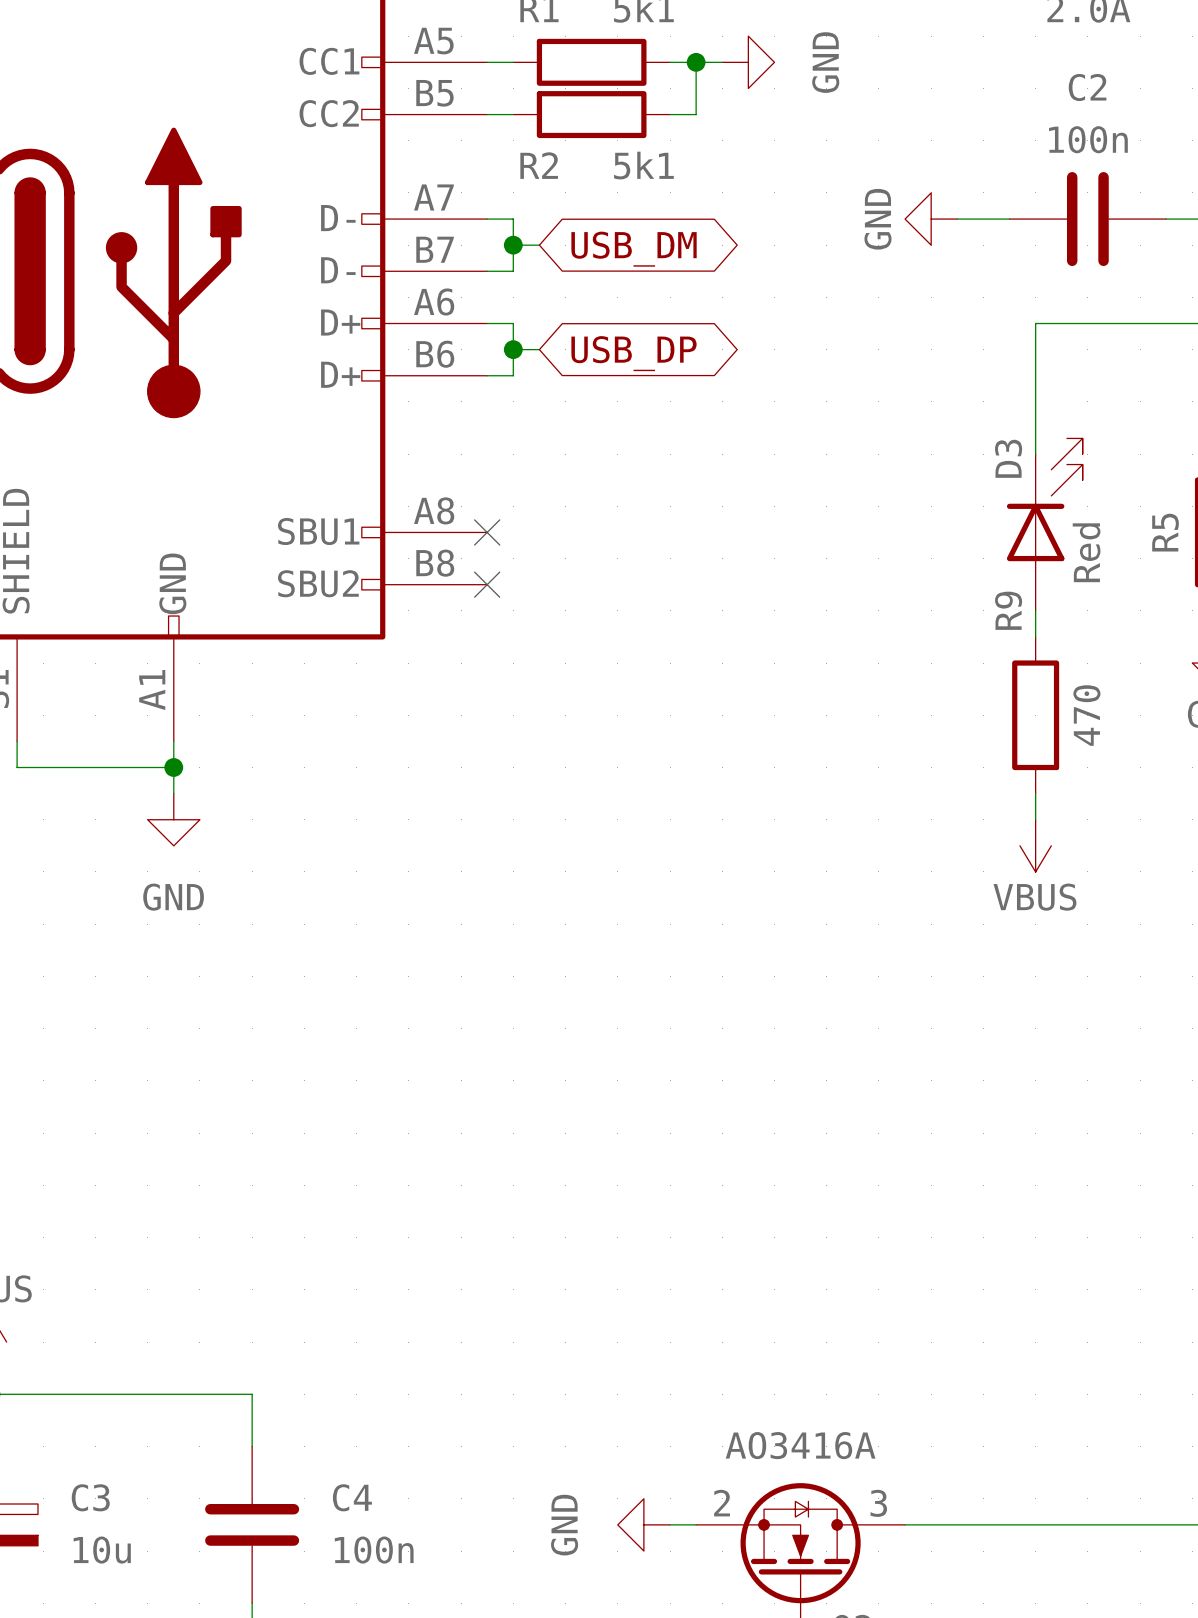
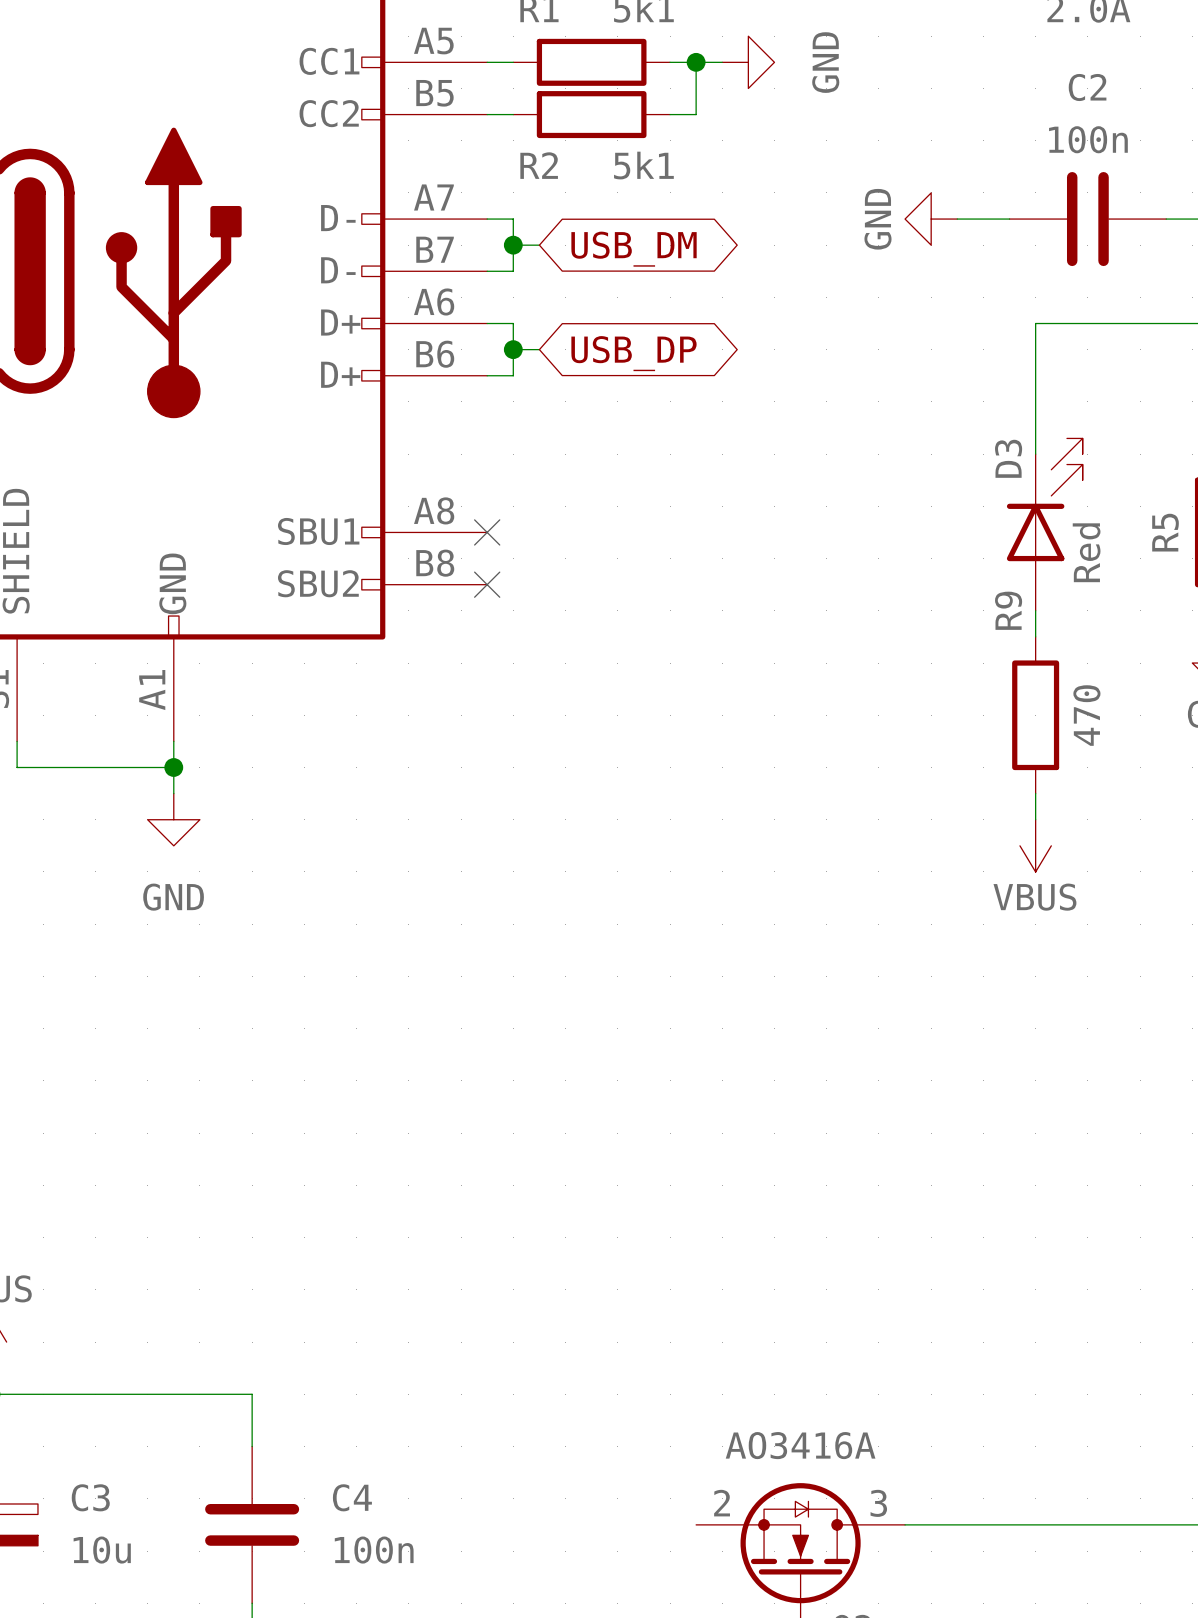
power symbol: GND (643, 1524) -> none
wire: (670, 1524) (696, 1524) -> none

